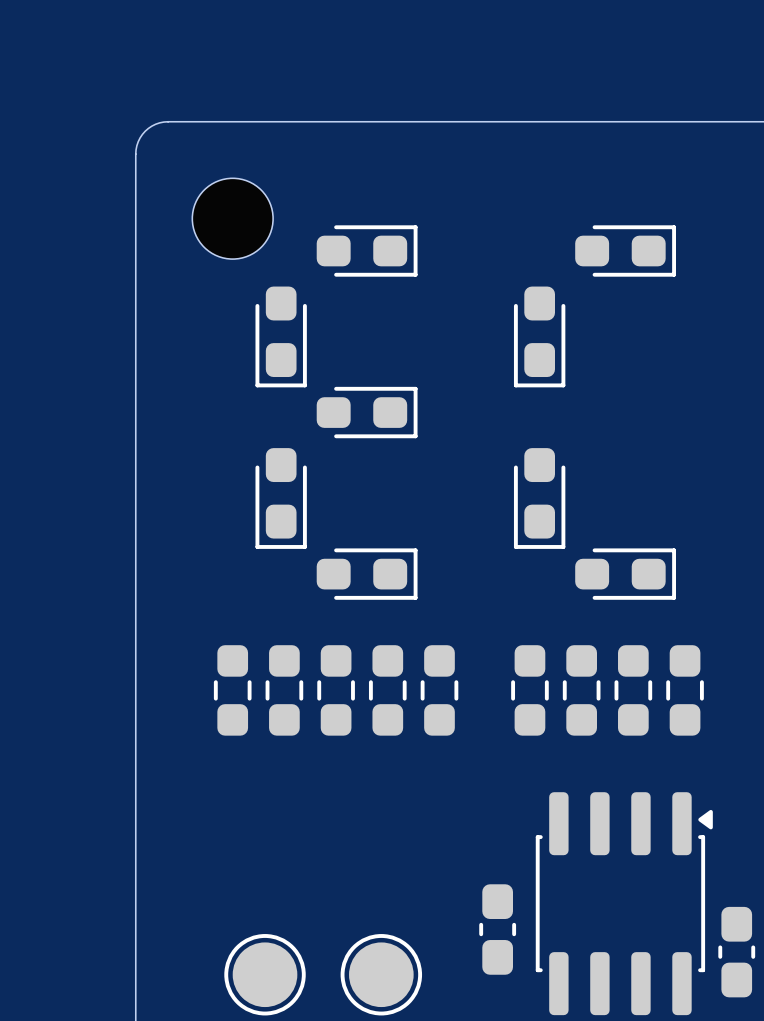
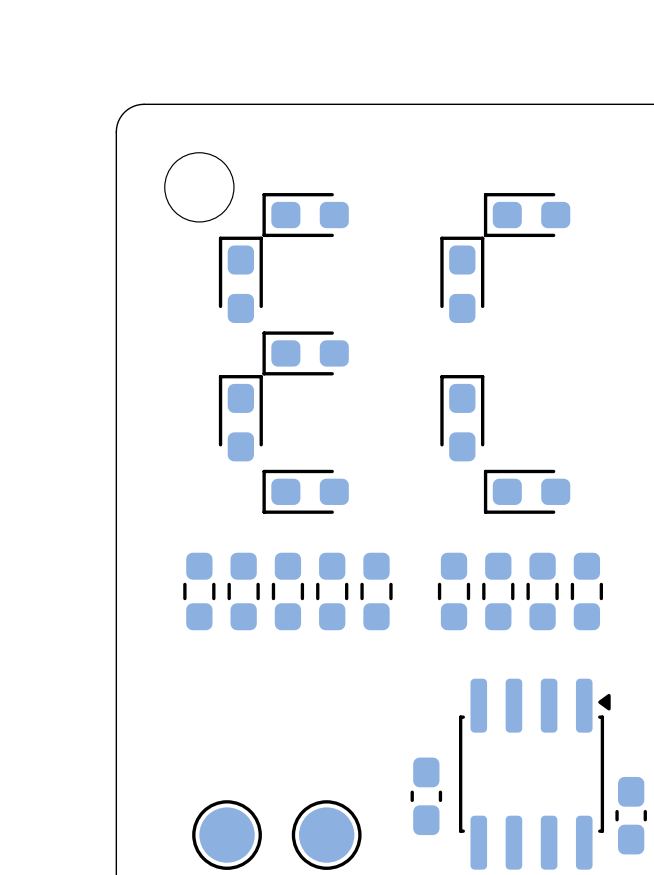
part rotation: 0° (367, 251) -> 180° (305, 215)
part rotation: 0° (625, 251) -> 180° (527, 215)
part rotation: 0° (281, 336) -> 180° (240, 279)
part rotation: 0° (539, 336) -> 180° (462, 279)
part rotation: 0° (367, 412) -> 180° (305, 353)
part rotation: 0° (281, 498) -> 180° (240, 418)
part rotation: 0° (539, 498) -> 180° (462, 418)
part rotation: 0° (367, 574) -> 180° (305, 491)
part rotation: 0° (625, 574) -> 180° (527, 491)

